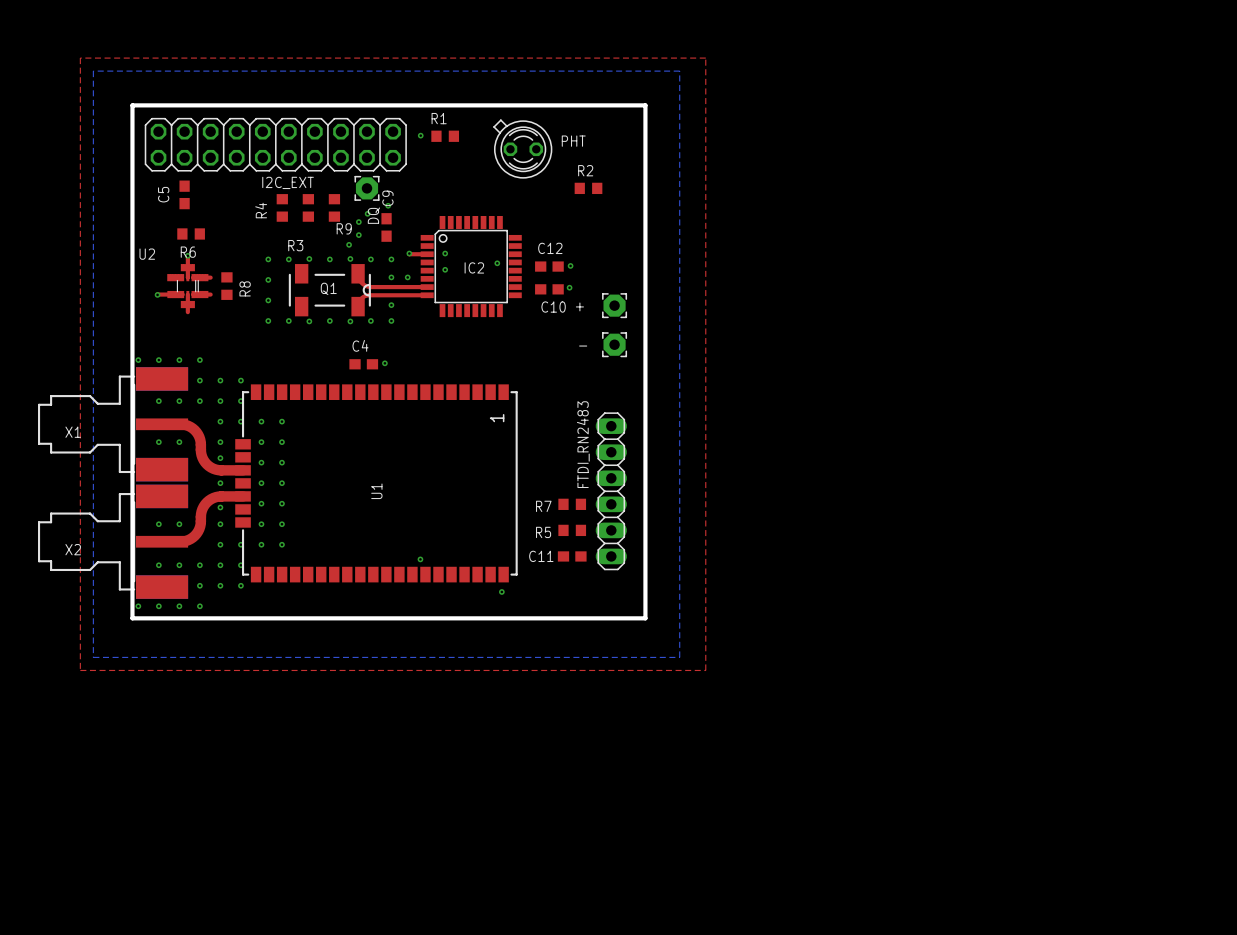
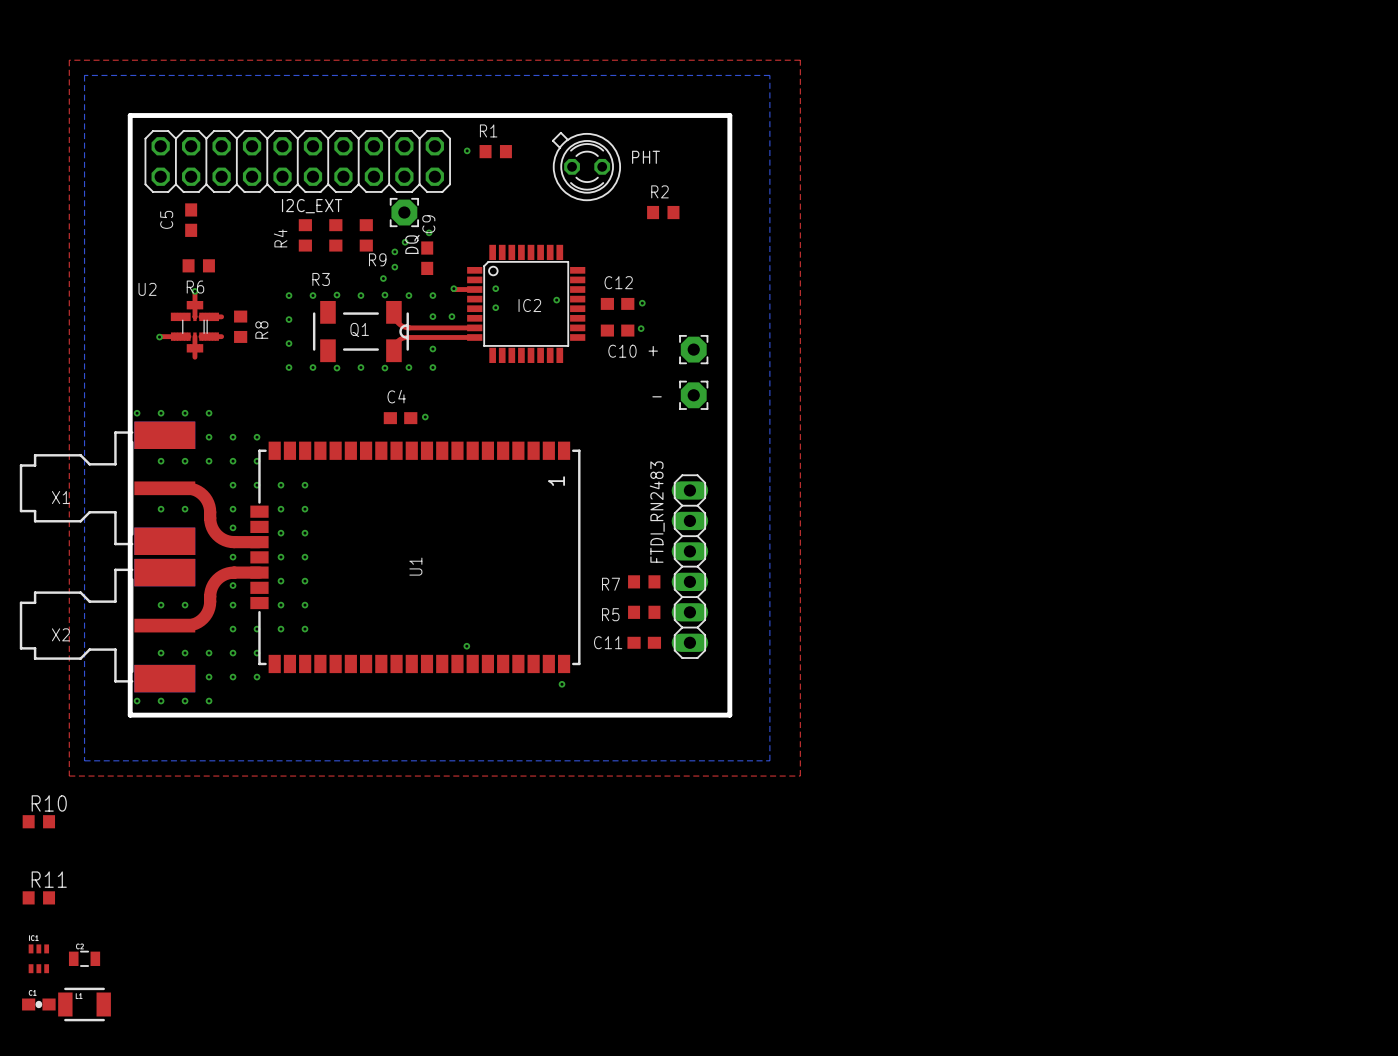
R10: none -> (38, 821)
R11: none -> (38, 897)
part: none -> (38, 958)
part: none -> (84, 958)
part: none -> (38, 1004)
part: none -> (84, 1004)

